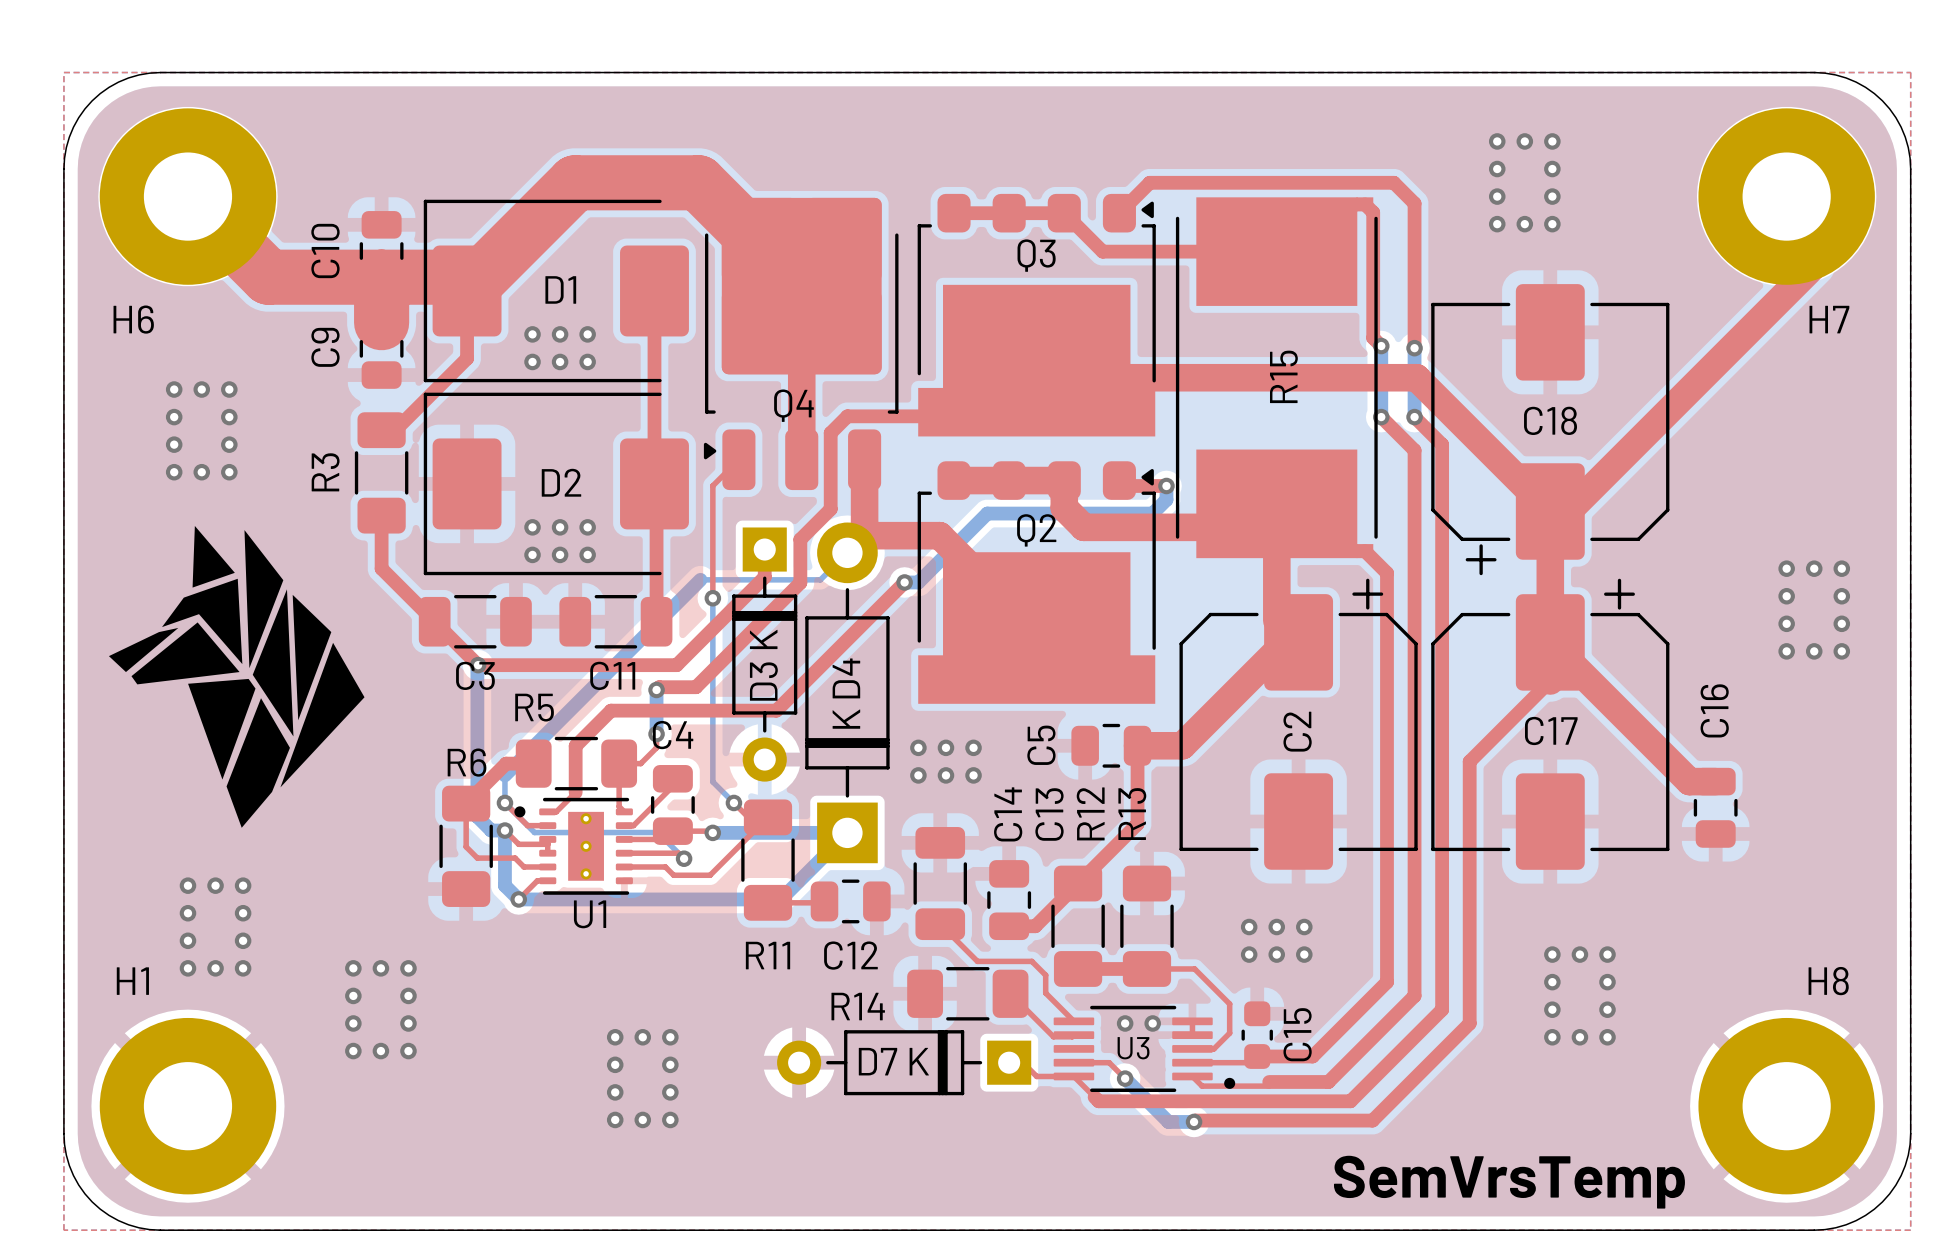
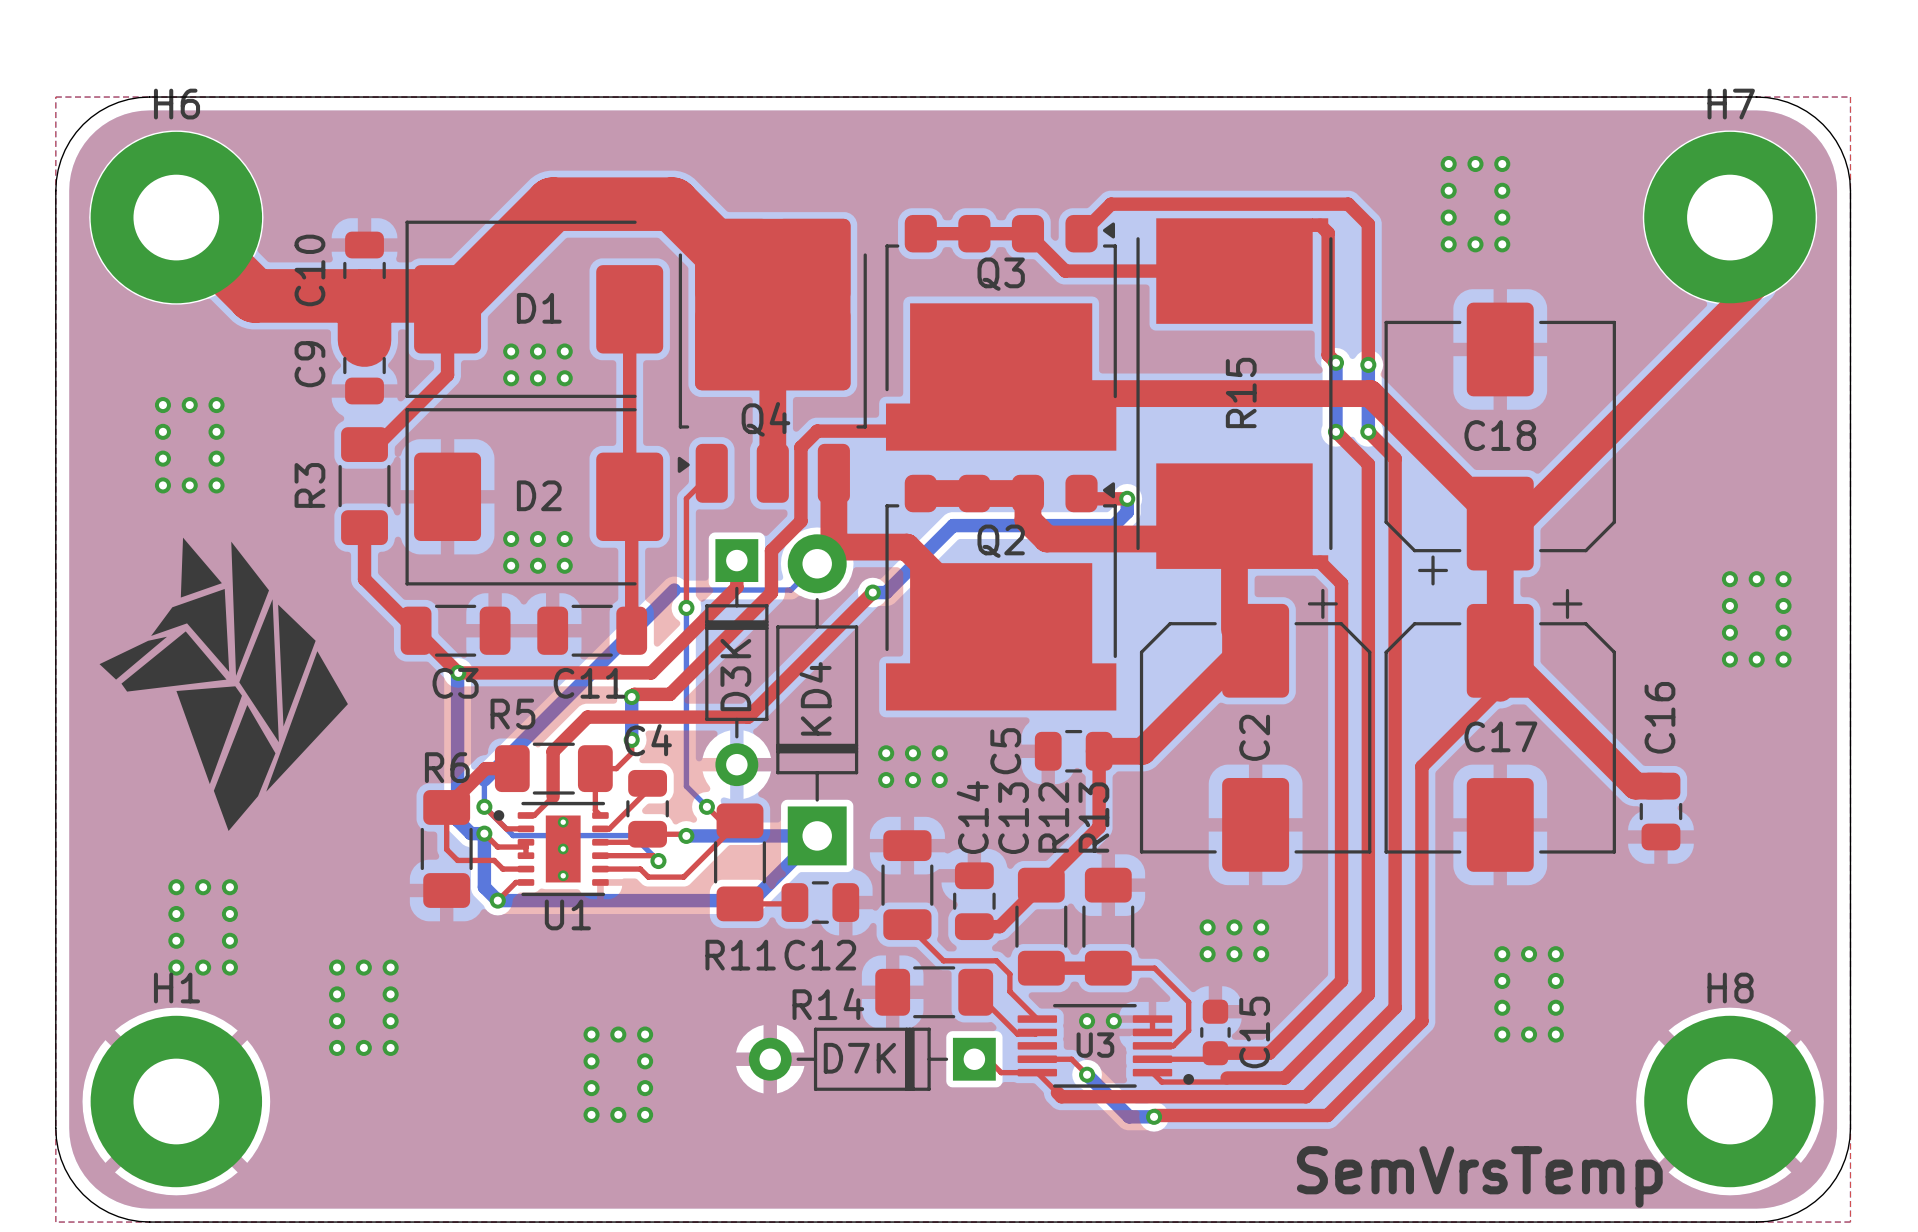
H6 name position: H6 (133, 319) -> H6 (176, 104)
H7 name position: H7 (1829, 319) -> H7 (1731, 104)
H1 name position: H1 (132, 981) -> H1 (176, 988)
H8 name position: H8 (1828, 981) -> H8 (1730, 988)

